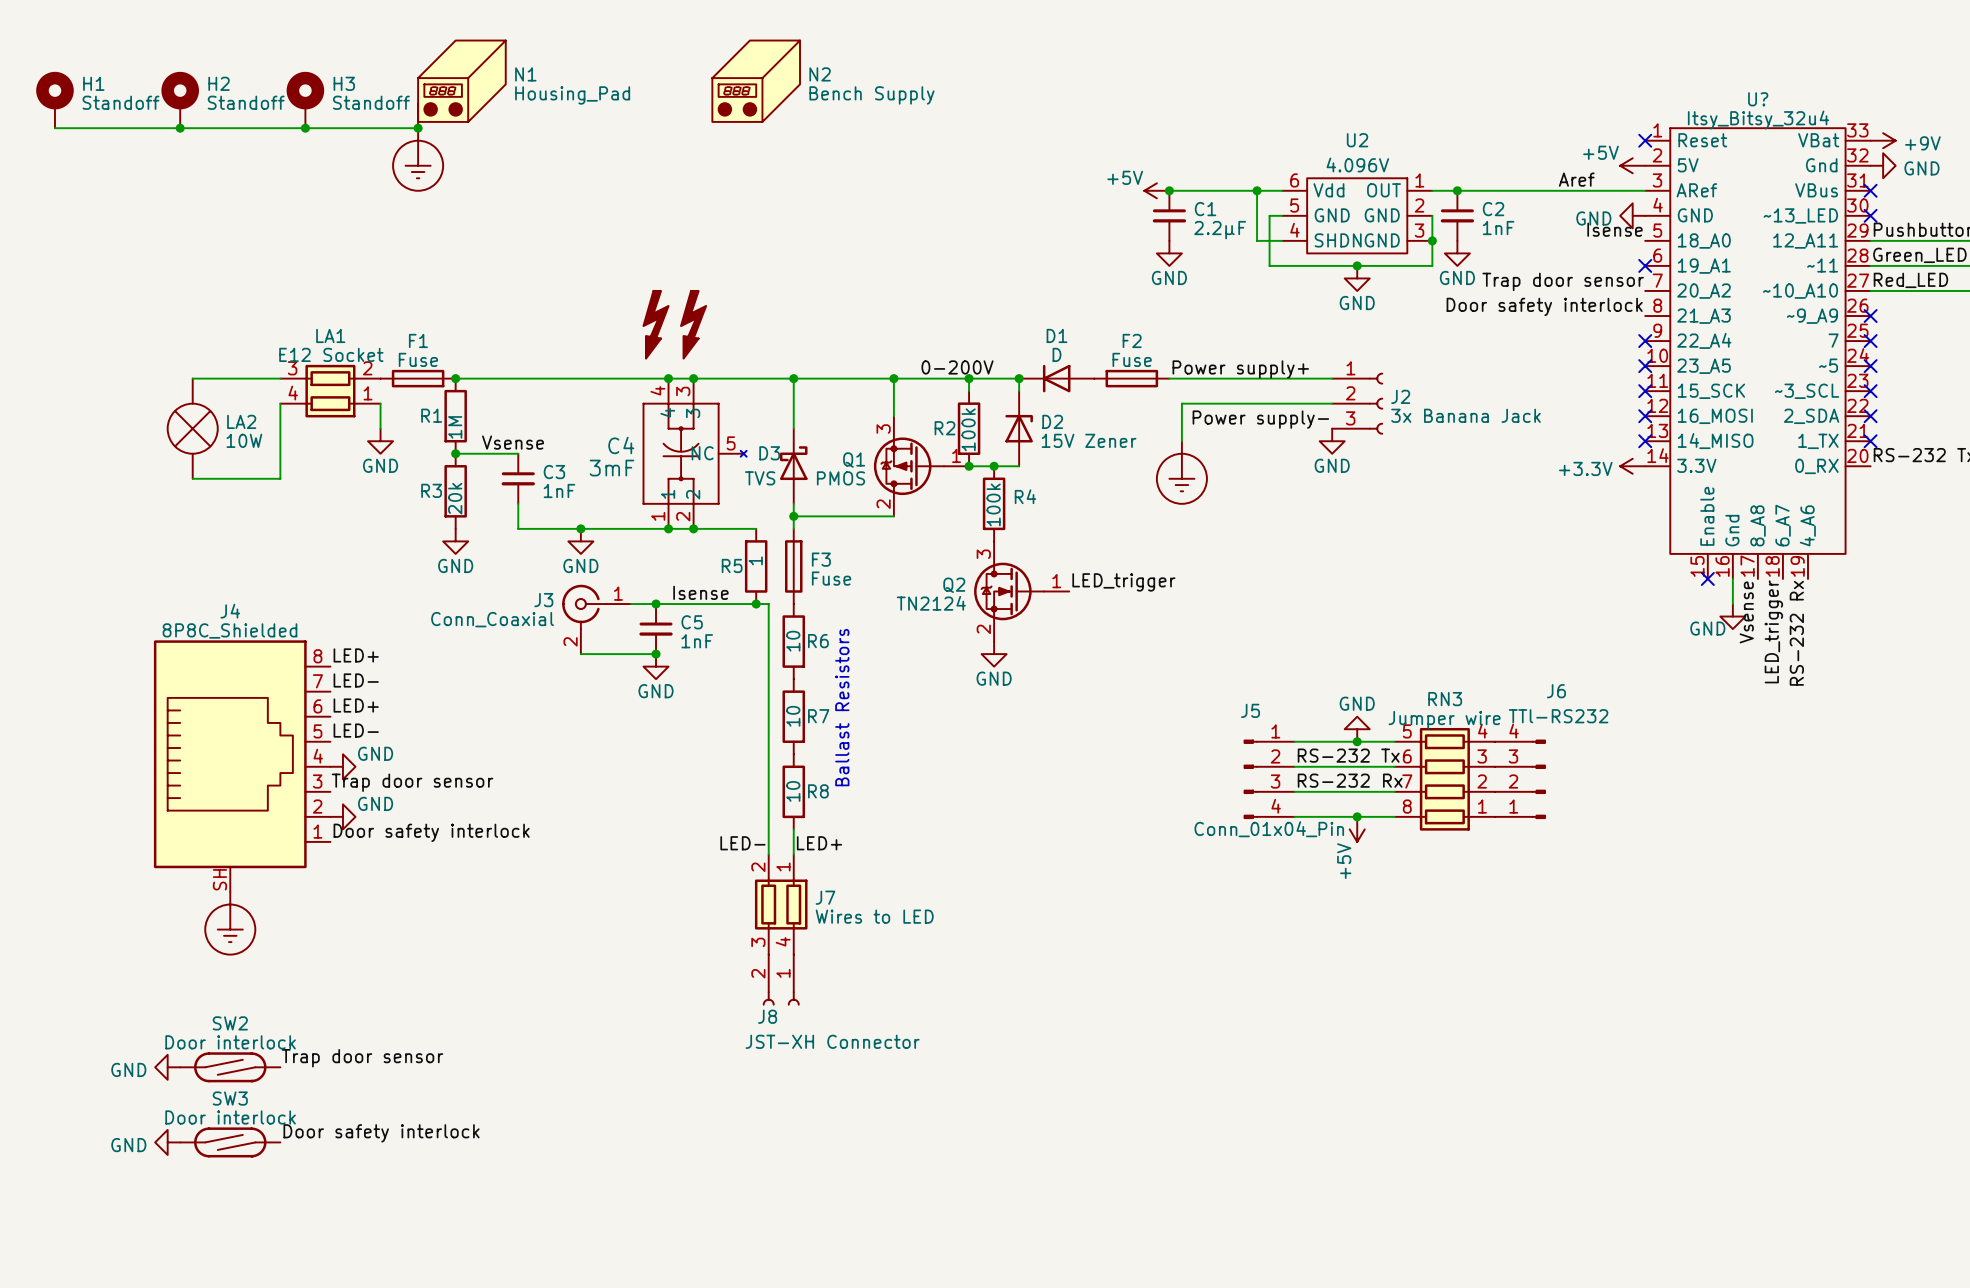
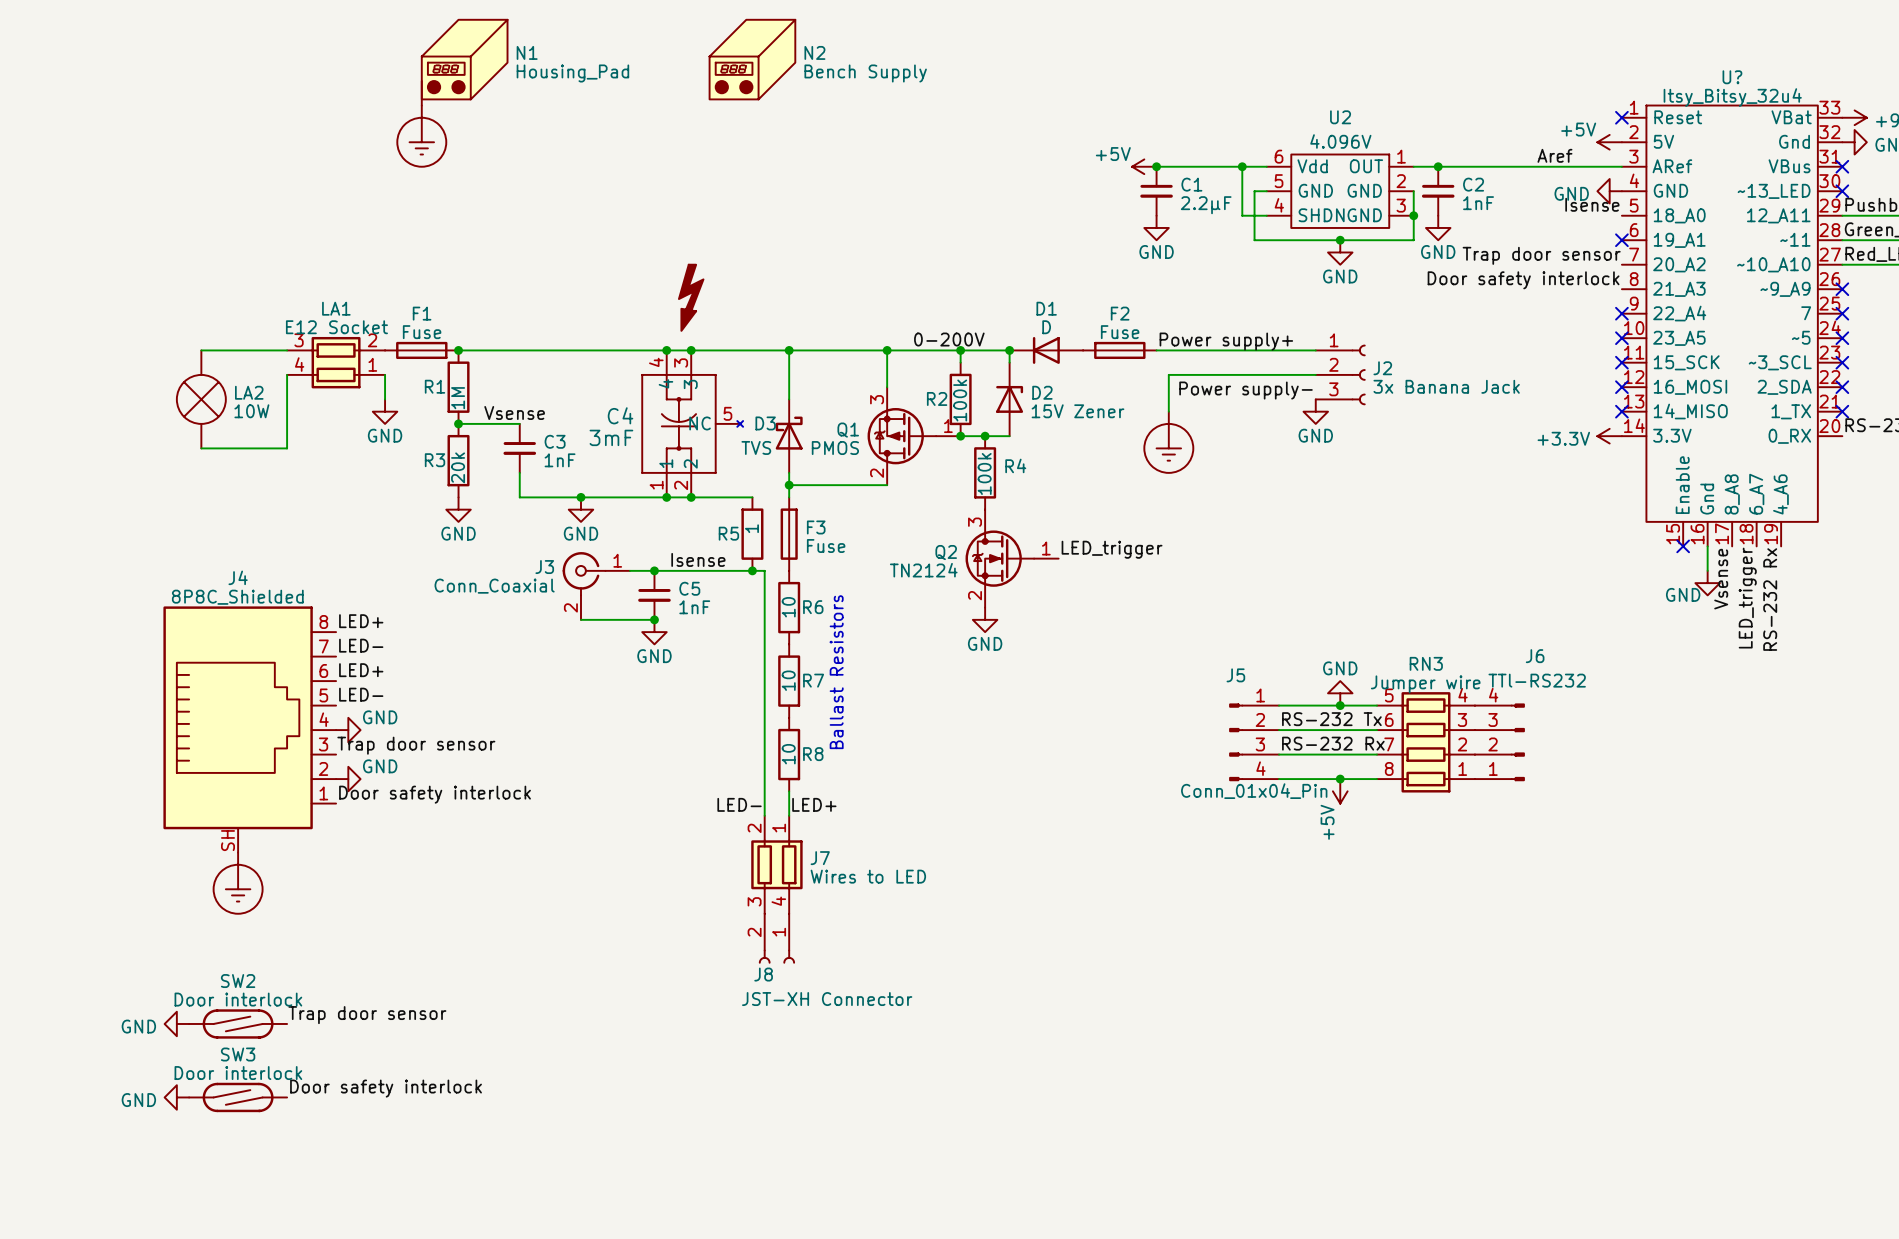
H1: Standoff (54, 100) -> none
H2: Standoff (180, 100) -> none
H3: Standoff (305, 100) -> none
wire: (54, 128) (418, 128) -> none
junction: (180, 128) -> none
junction: (305, 128) -> none
junction: (418, 128) -> none
part: (656, 324) -> none

